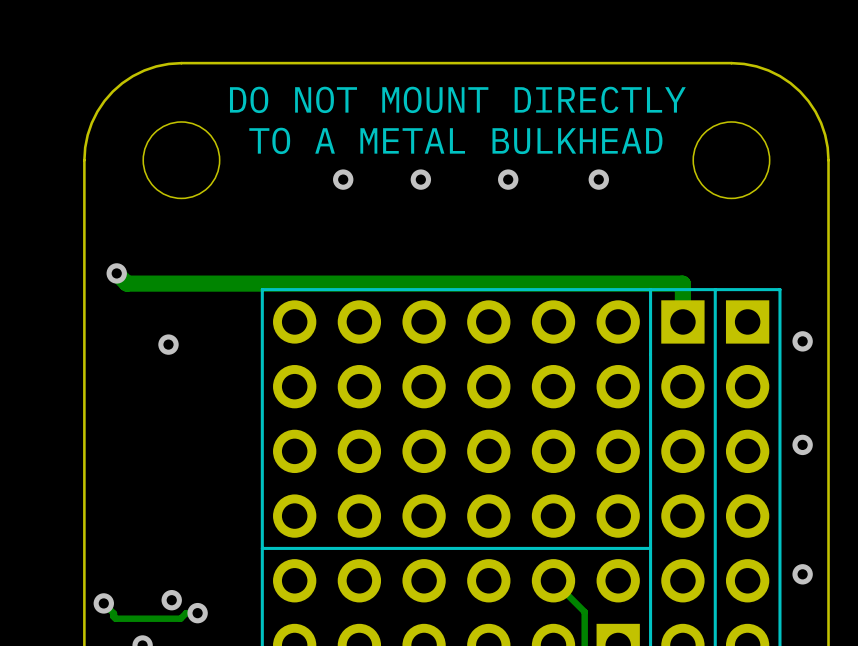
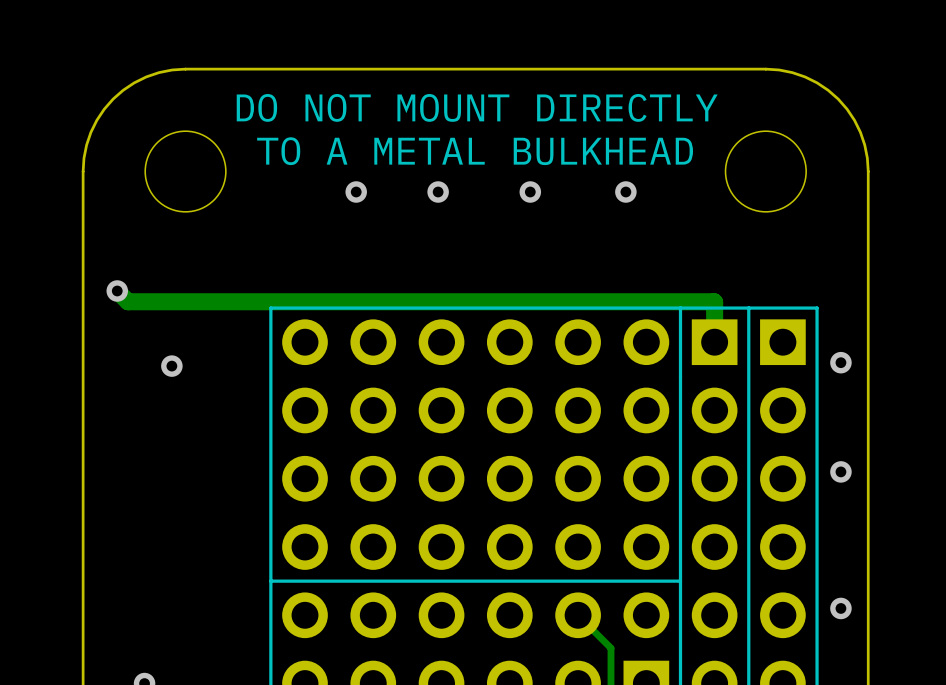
via: (171, 600) -> none
track: (103, 603) (113, 613) (113, 616) (115, 618) (180, 618) (186, 613) (197, 613) -> none
via: (103, 603) -> none
via: (197, 613) -> none

